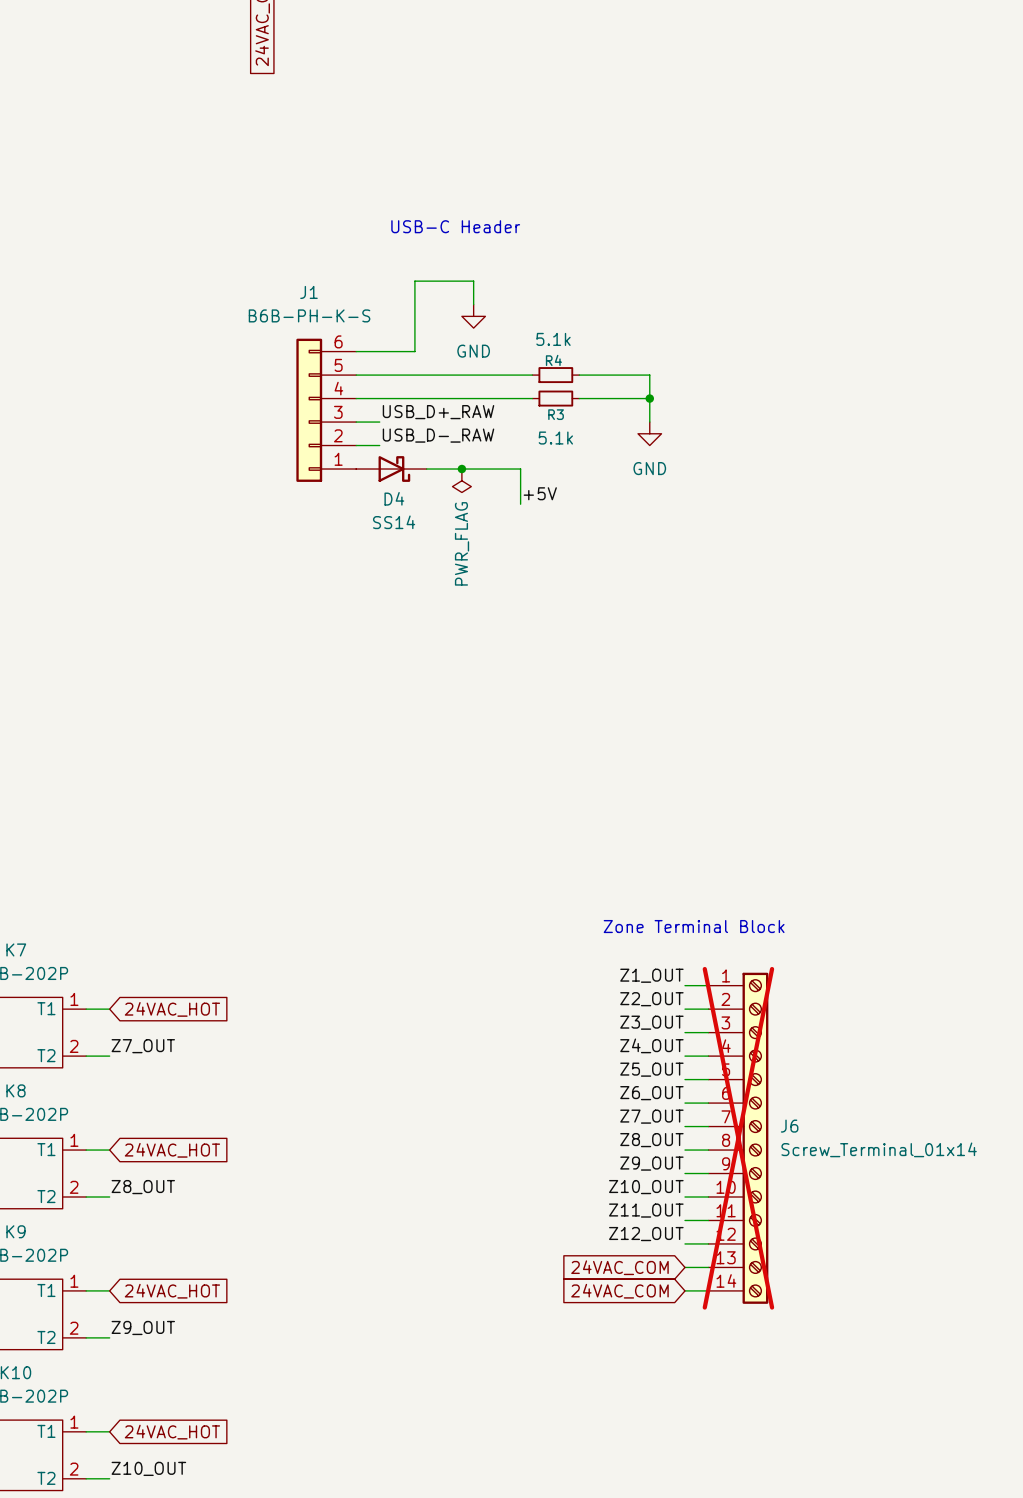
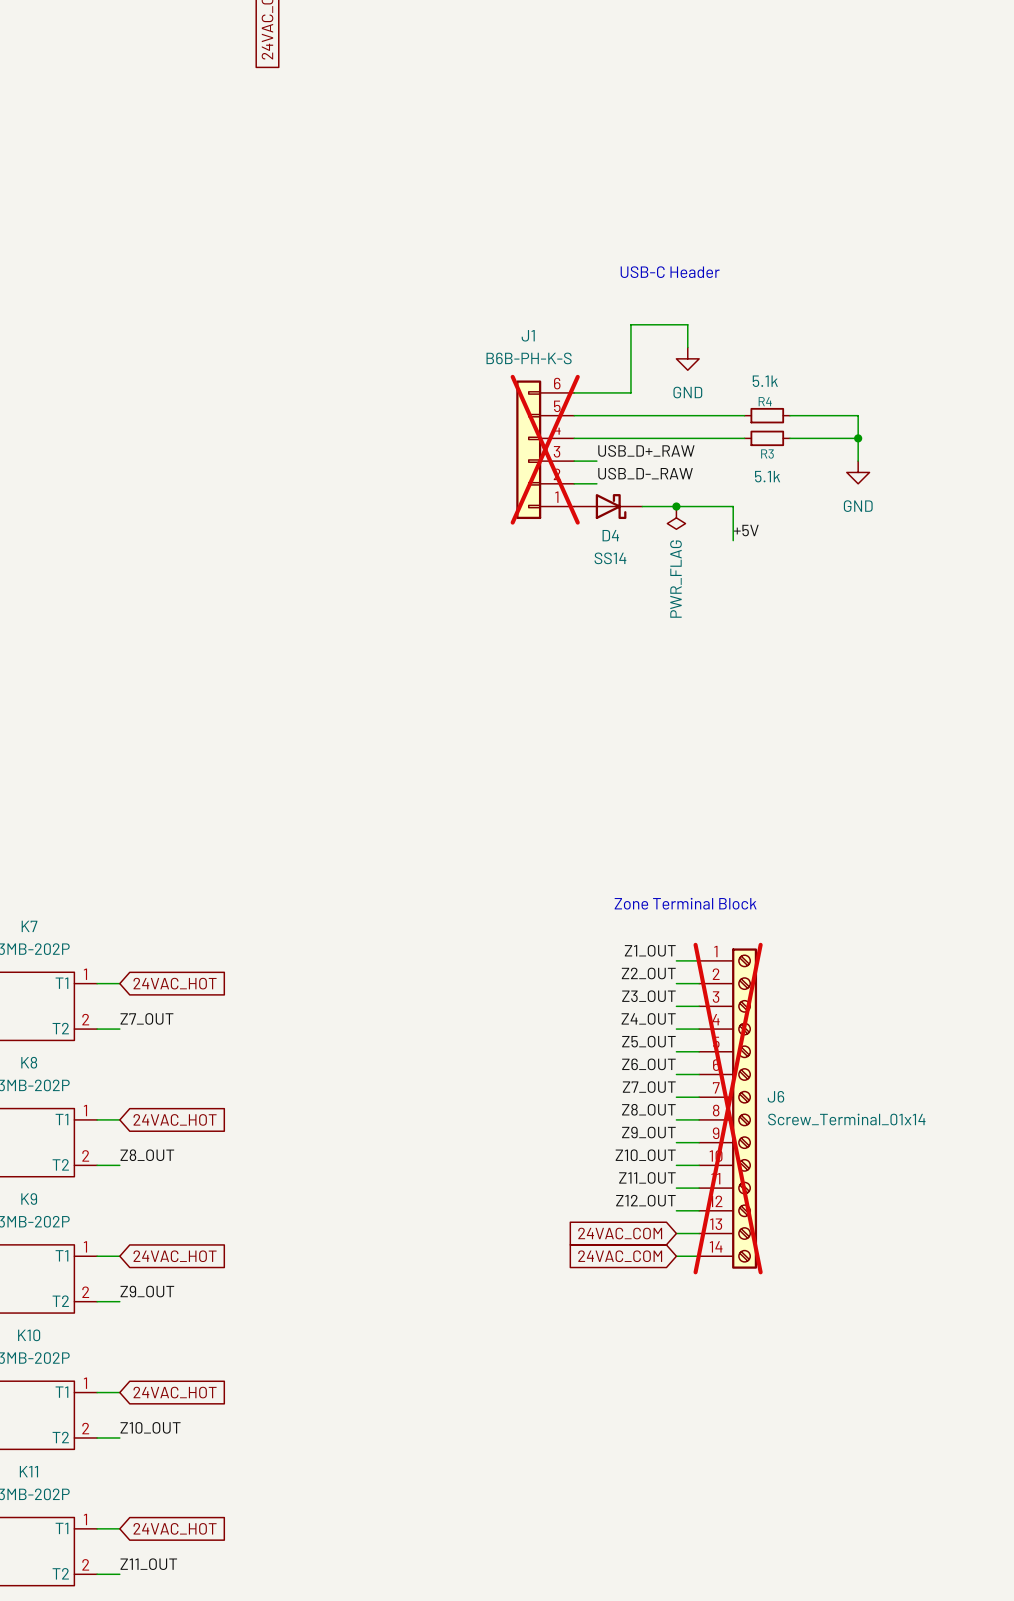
text position: USB-C Header (455, 226) -> USB-C Header (670, 272)
wire: (473, 304) (473, 281) (414, 281) (414, 351) (356, 351) -> none
power symbol: GND (473, 316) -> none
wire: (356, 375) (532, 375) -> (574, 415) (744, 415)
R4 position: (555, 375) -> (767, 415)
wire: (579, 375) (649, 375) (649, 422) -> (790, 415) (858, 415) (858, 461)
wire: (356, 398) (532, 398) -> (574, 438) (744, 438)
R3 position: (555, 398) -> (767, 438)
wire: (638, 398) (649, 398) -> (630, 392) (630, 324) (687, 324) (687, 347)
junction: (649, 398) -> none
J1 position: (326, 410) -> (545, 449)
label position: USB_D+_RAW (438, 412) -> USB_D+_RAW (646, 450)
wire: (356, 422) (379, 422) -> (574, 461) (596, 461)
power symbol position: GND (649, 433) -> GND (687, 358)
label position: USB_D-_RAW (438, 435) -> USB_D-_RAW (645, 473)
wire: (356, 445) (379, 445) -> (574, 483) (596, 483)
wire: none -> (790, 438) (858, 438)
junction: none -> (858, 438)
J1 do-not-place cross: none -> (545, 449)
D4 position: (391, 469) -> (608, 506)
wire: (426, 469) (520, 469) (520, 504) -> (642, 506) (733, 506) (733, 540)
junction: (461, 469) -> none
power symbol position: PWR_FLAG (461, 480) -> PWR_FLAG (676, 517)
power symbol: none -> GND (858, 472)
label position: +5V (540, 493) -> +5V (746, 530)
junction: none -> (676, 506)

